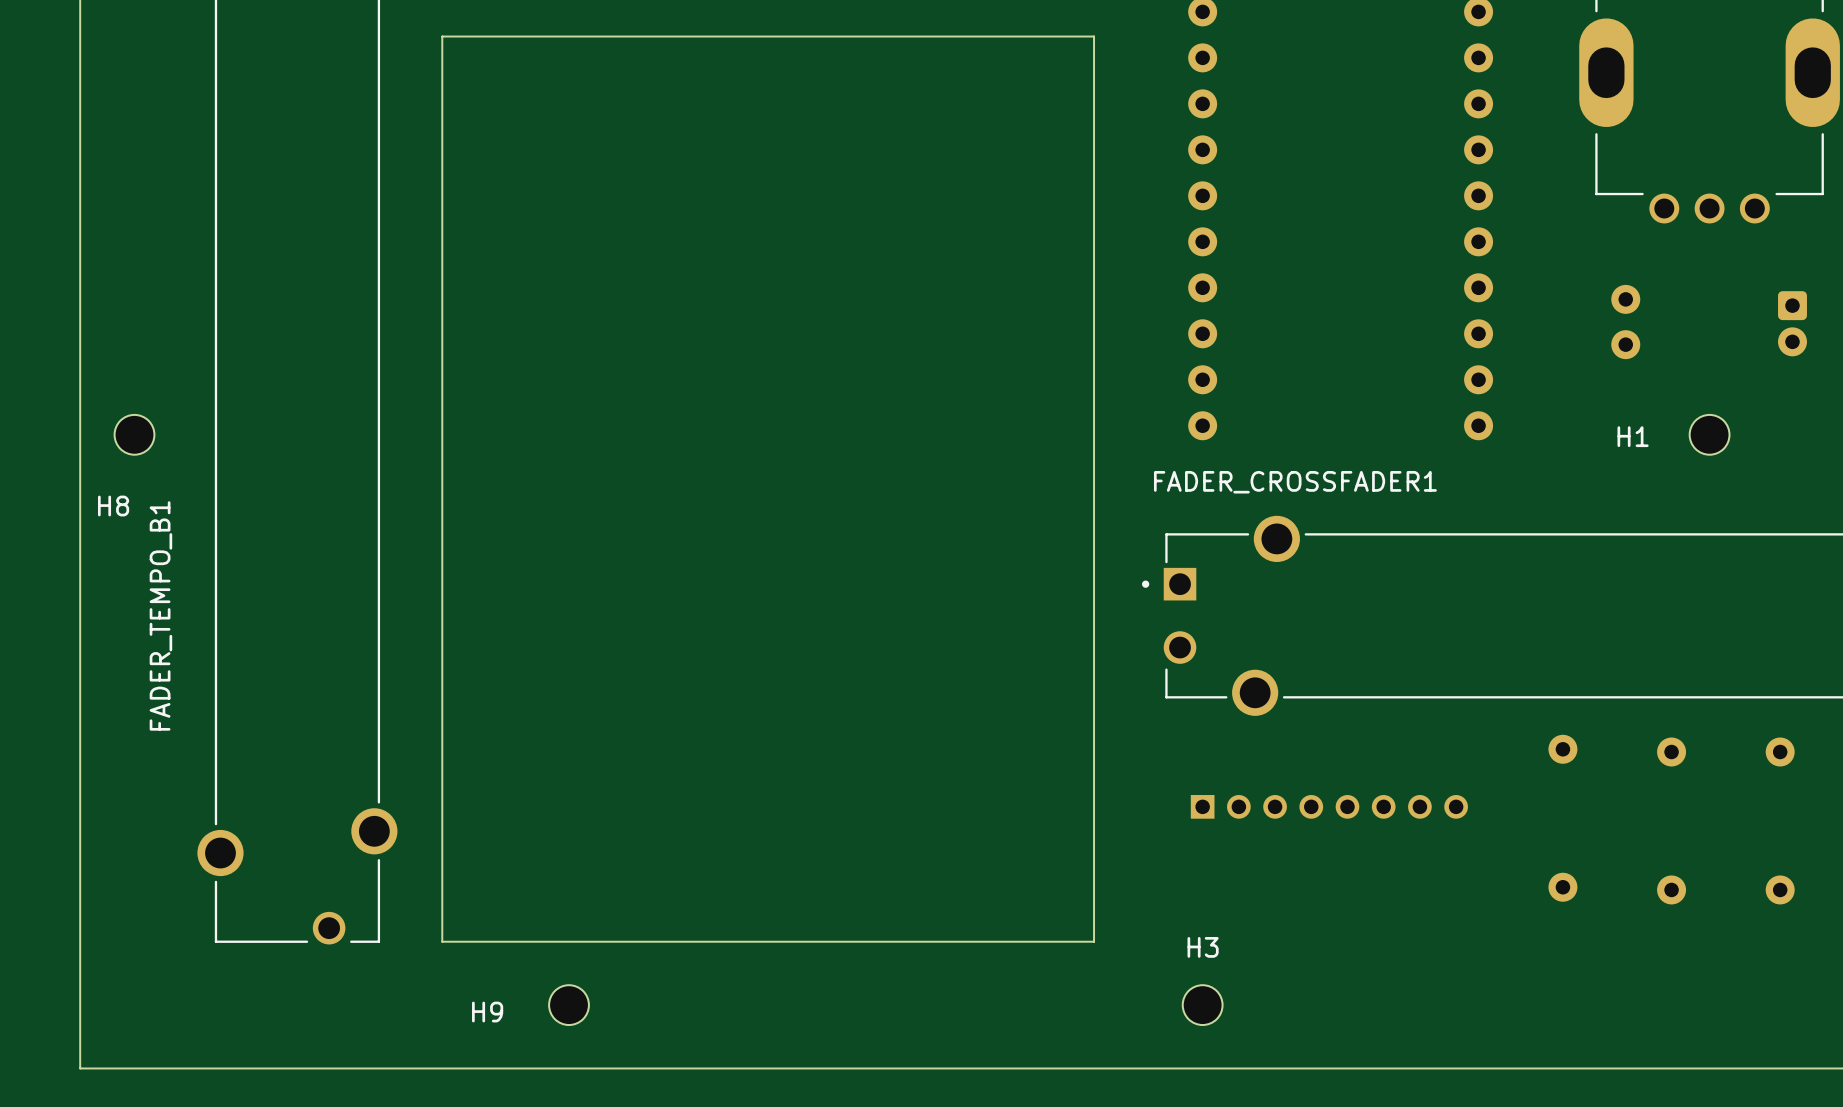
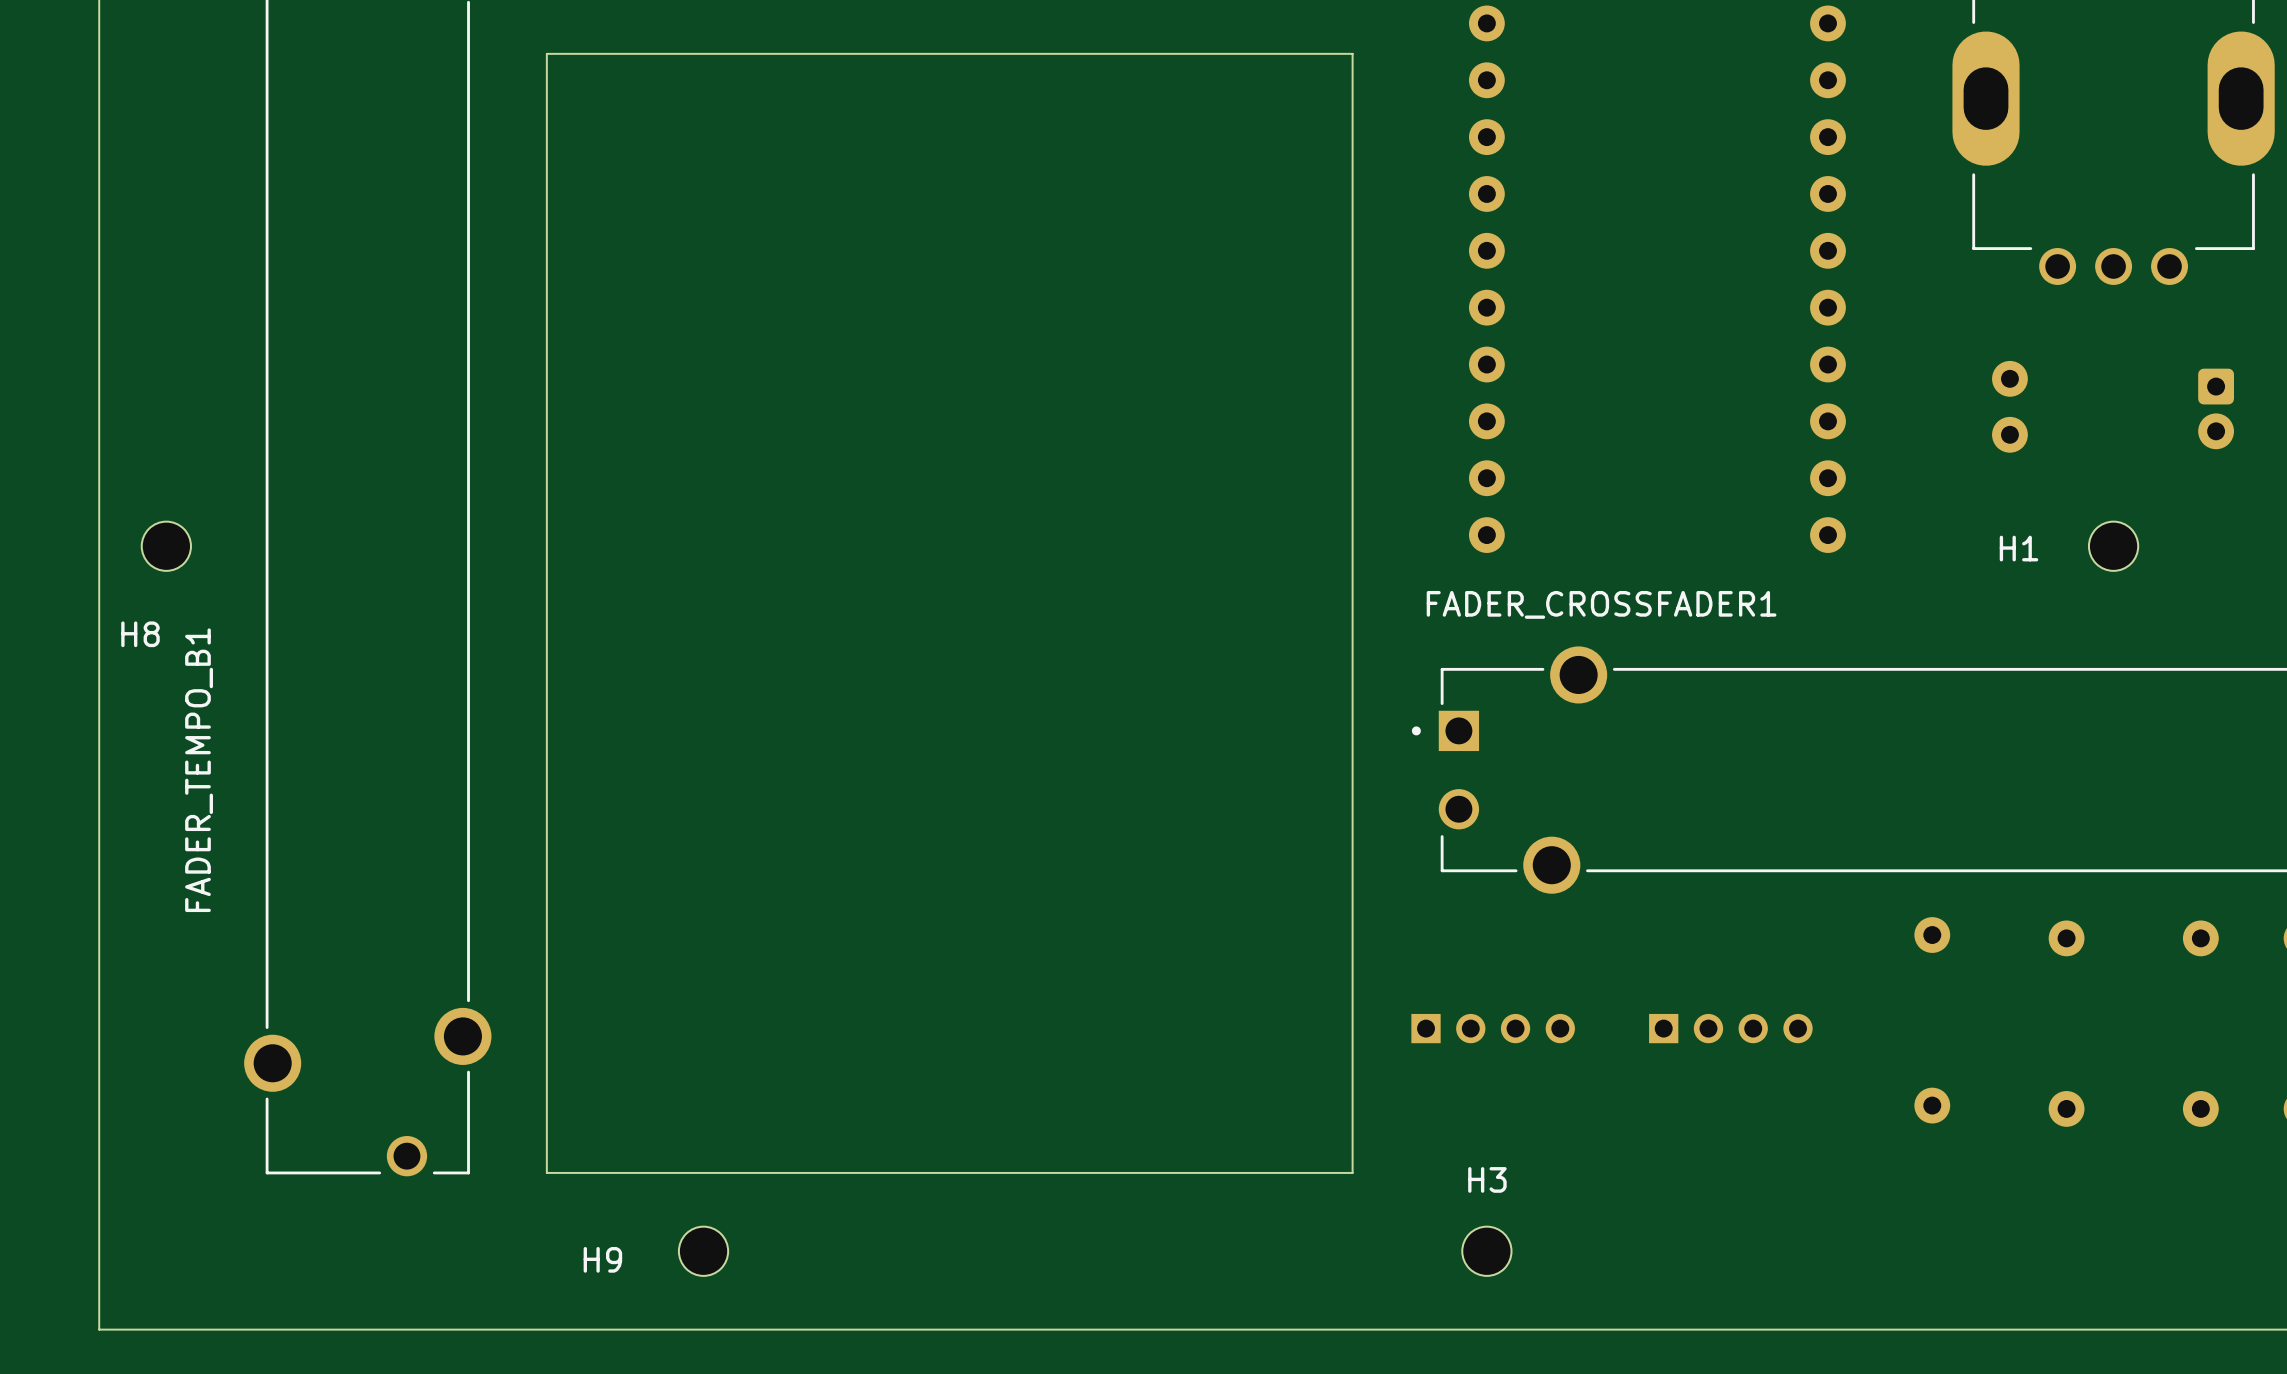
part: (1329, 806) -> none
part: none -> (1493, 1028)
part: none -> (1730, 1028)

